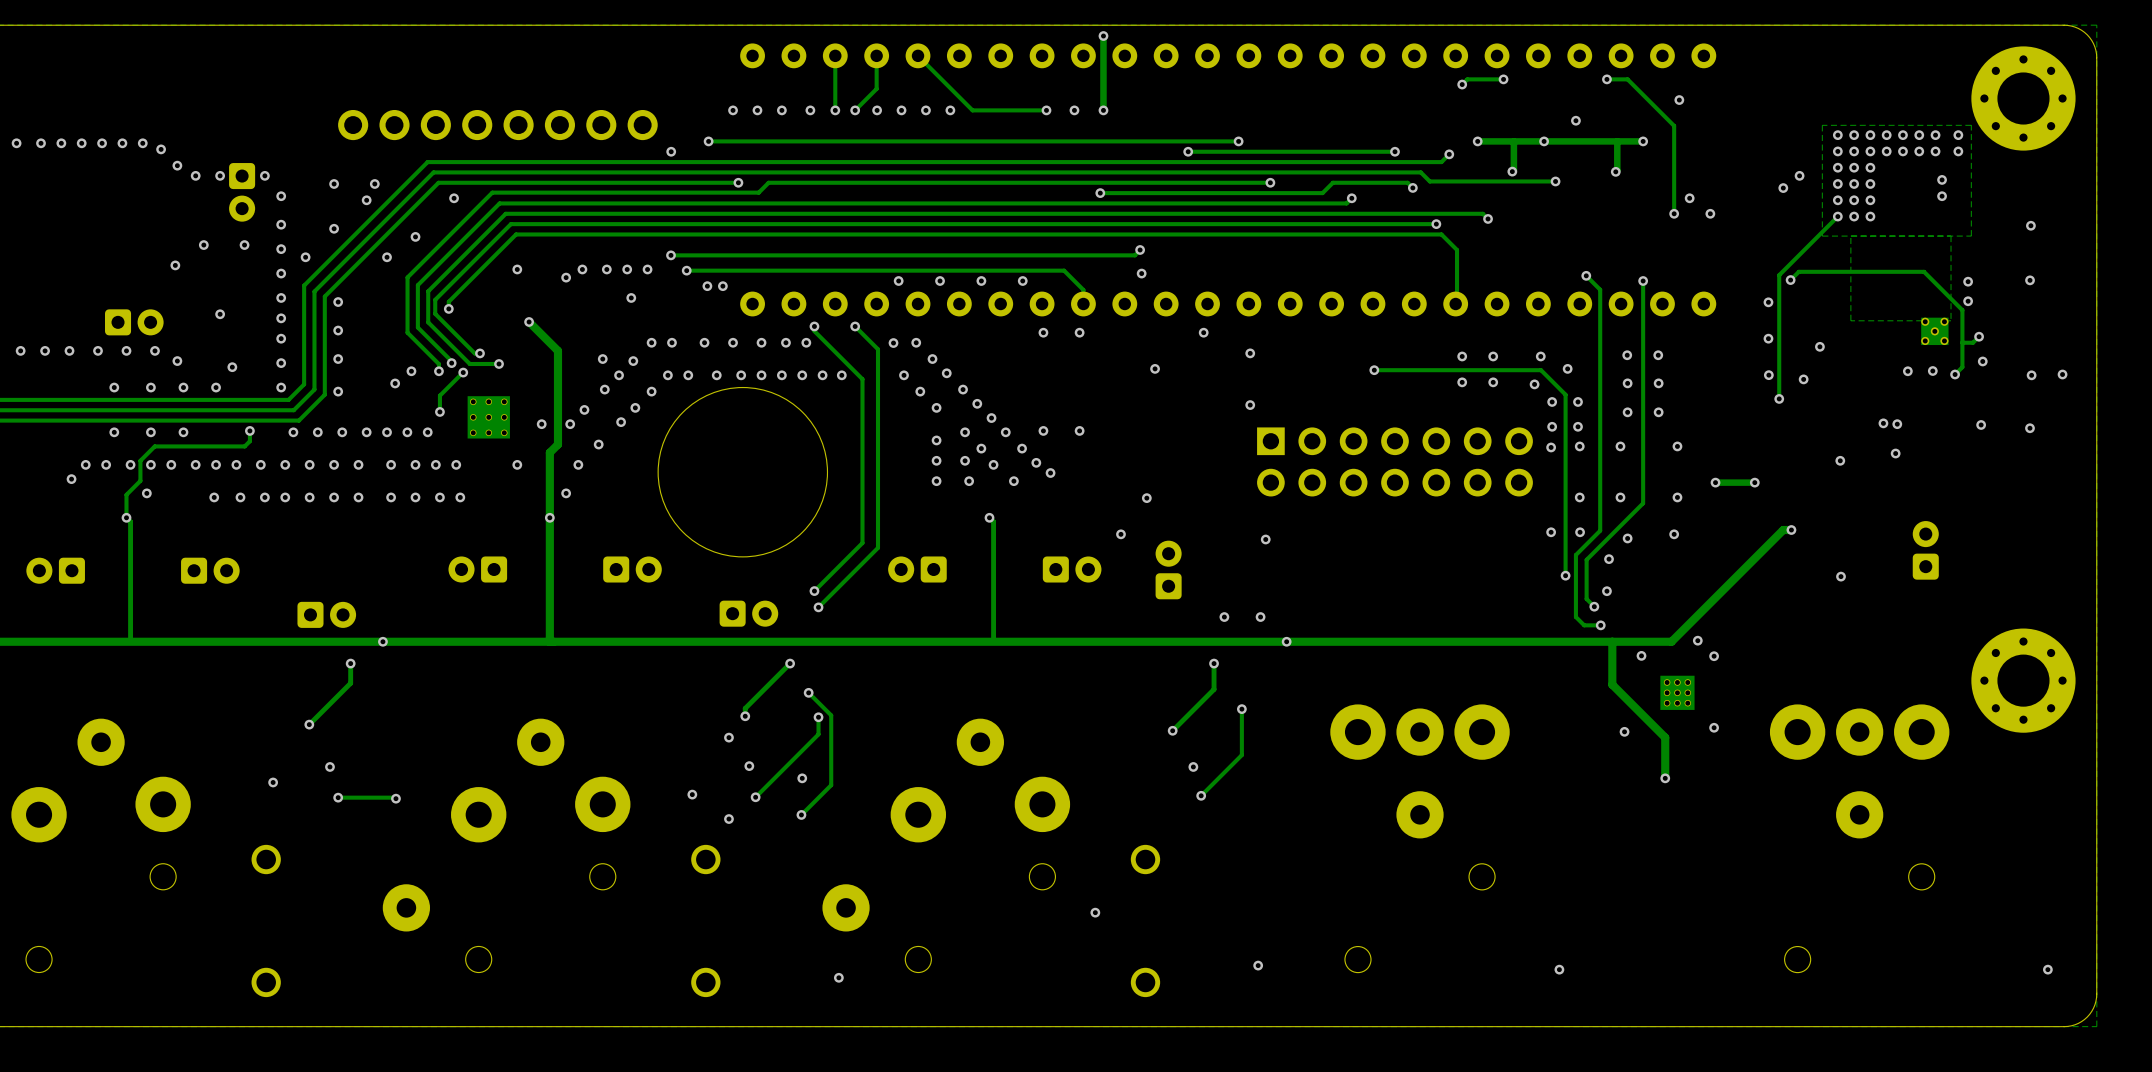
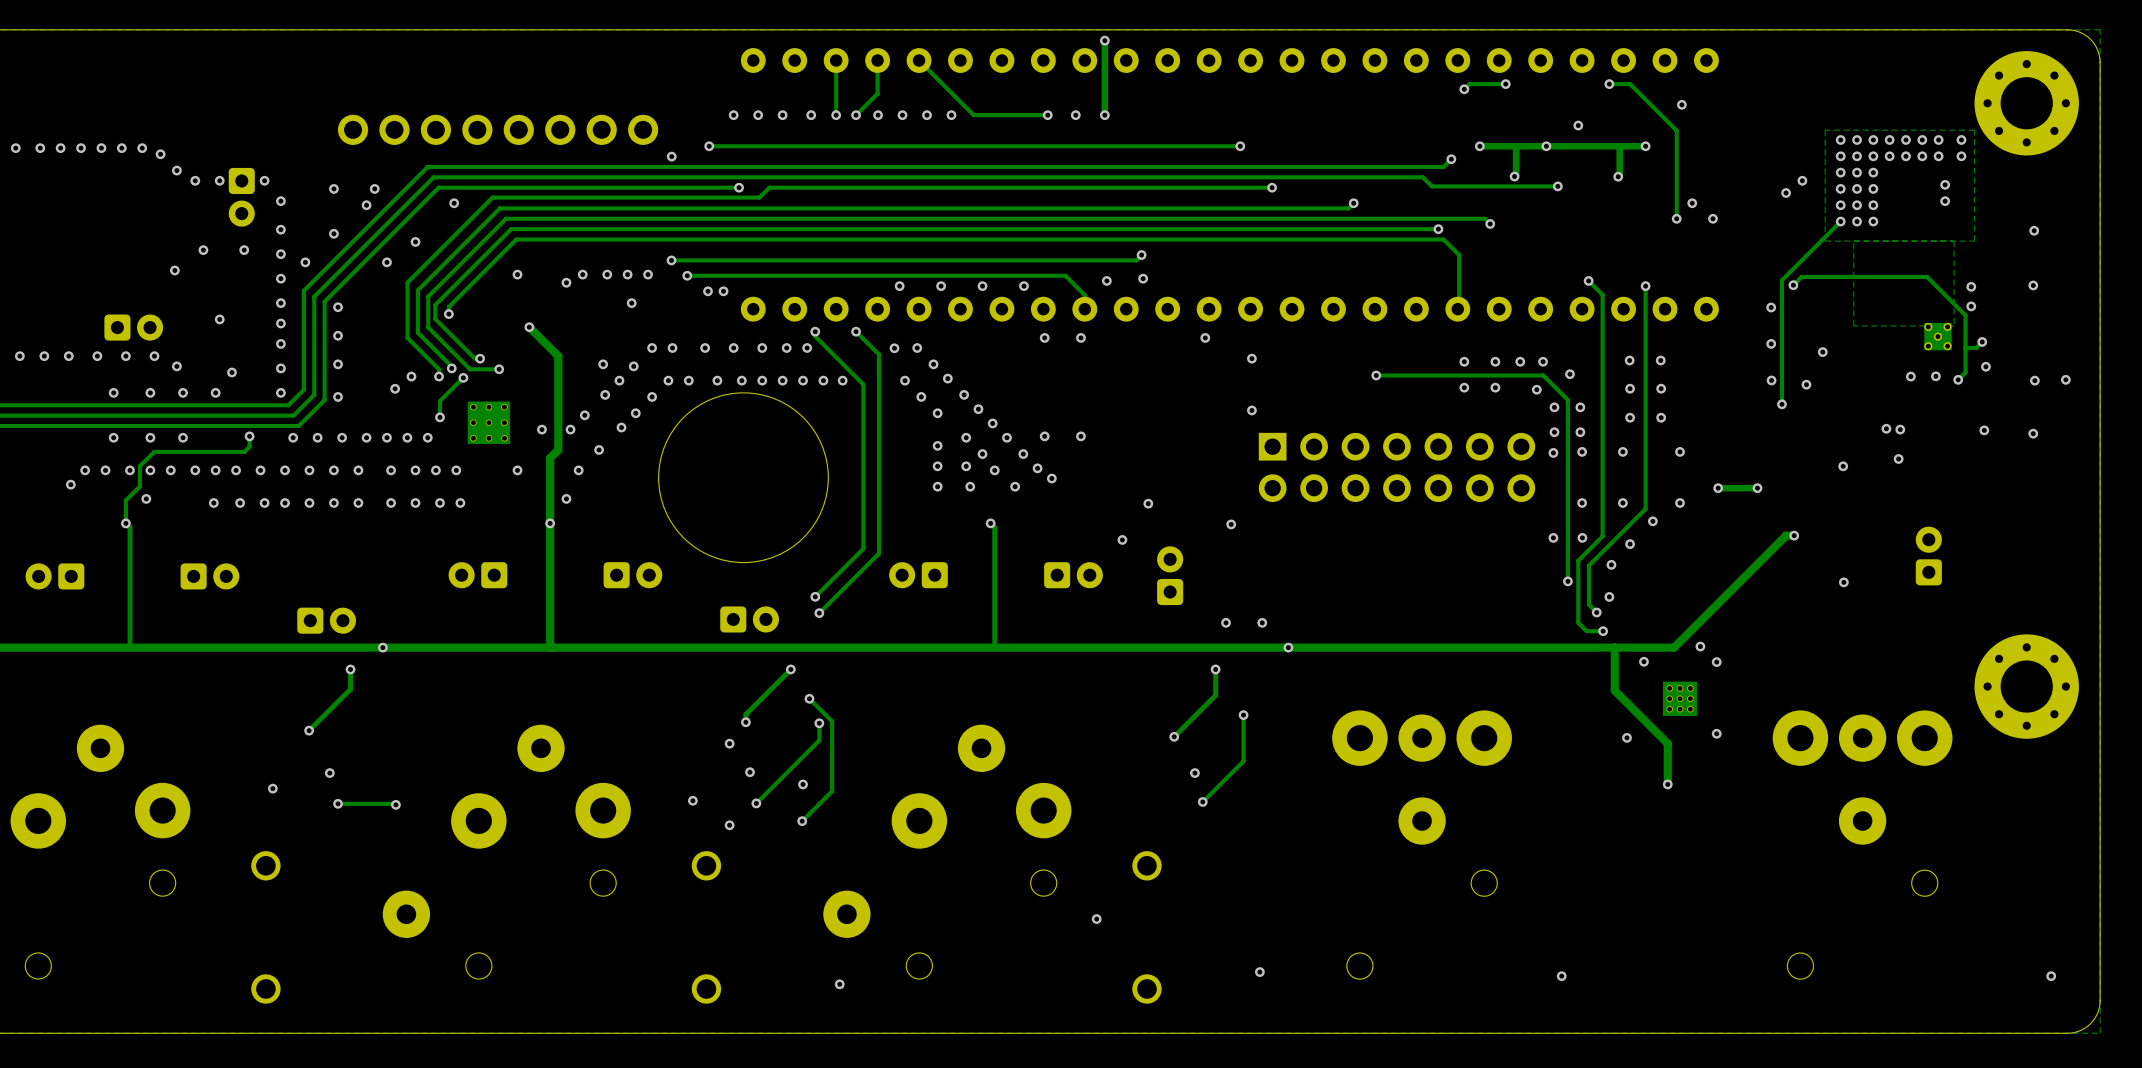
via: (1188, 151) -> none
track: (1394, 151) (1188, 151) -> none
via: (1394, 151) -> none
track: (1412, 187) (1407, 182) (1332, 182) (1322, 193) (1100, 193) -> none
via: (1412, 187) -> none
via: (1100, 193) -> none
via: none -> (1106, 280)
via: none -> (1520, 361)
via: (1155, 368) -> none
via position: (1674, 534) -> (1652, 521)
via position: (1265, 539) -> (1231, 524)

